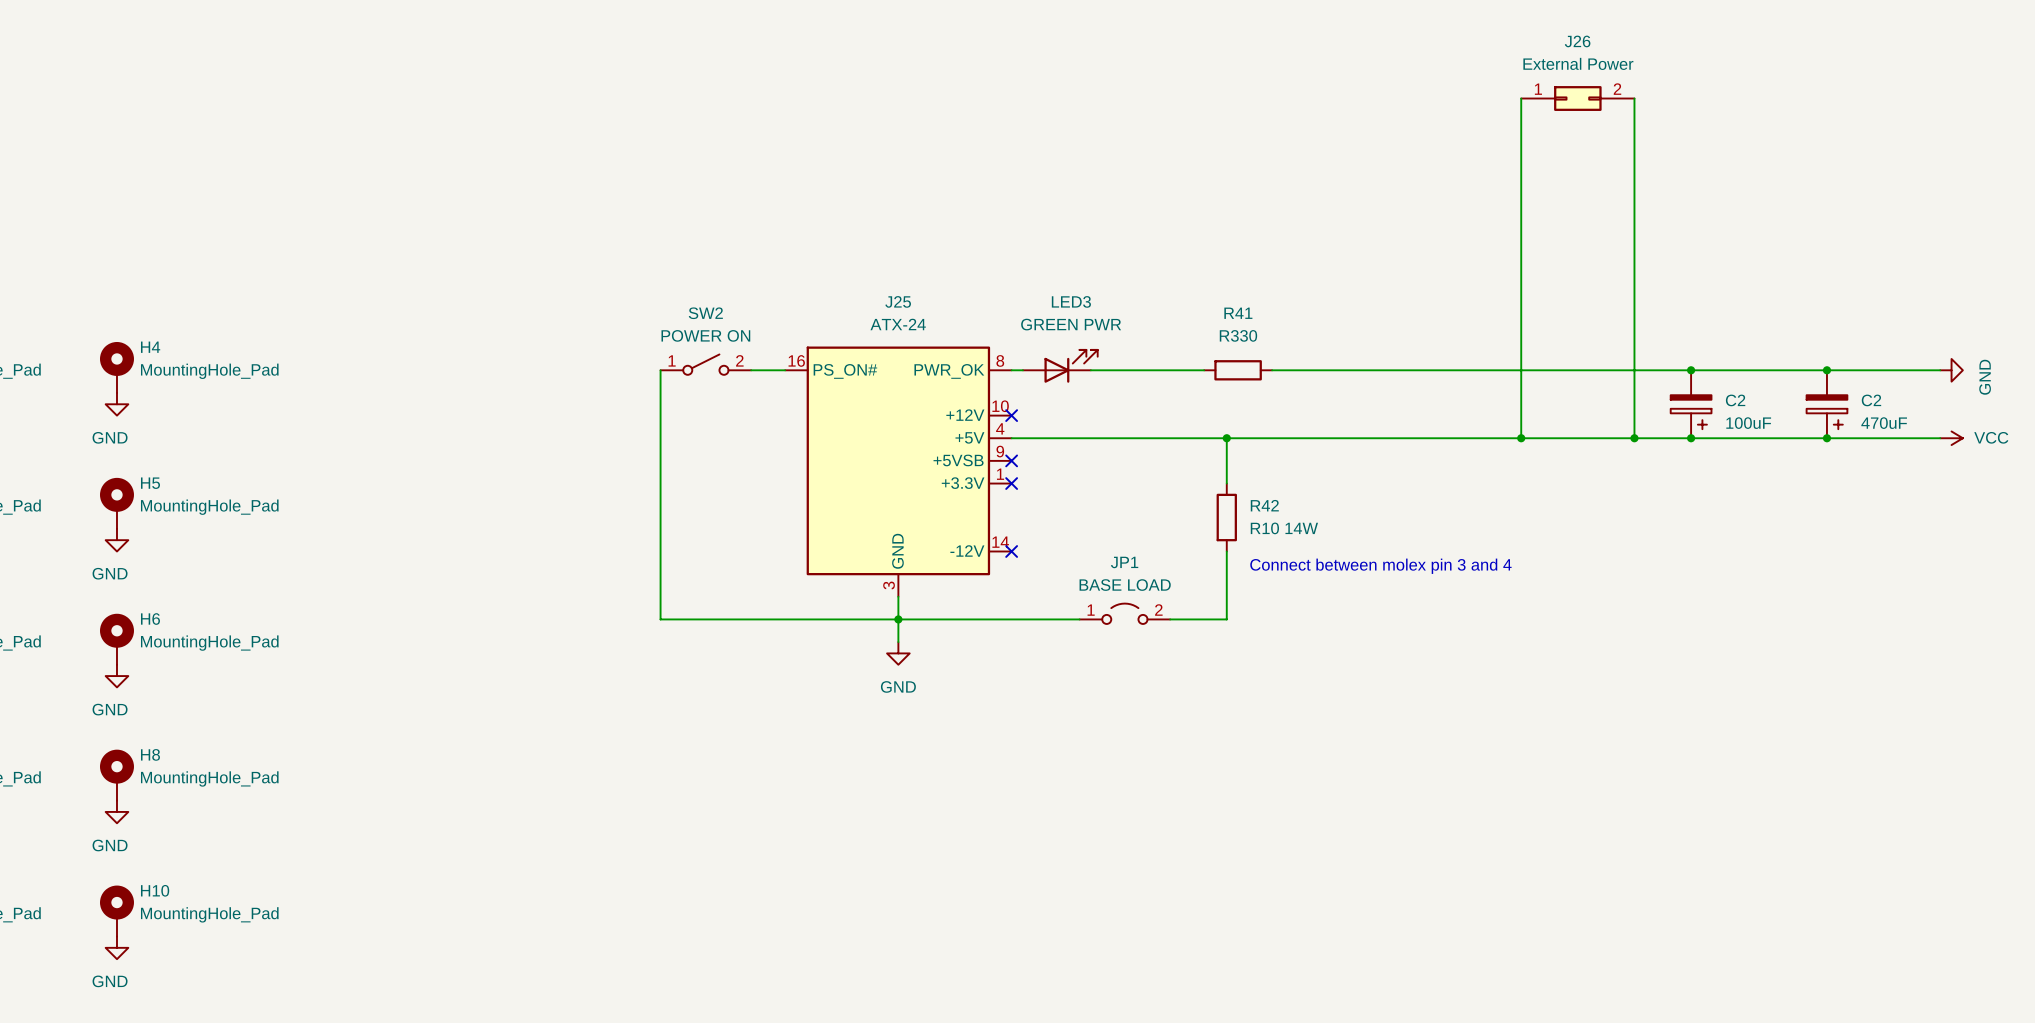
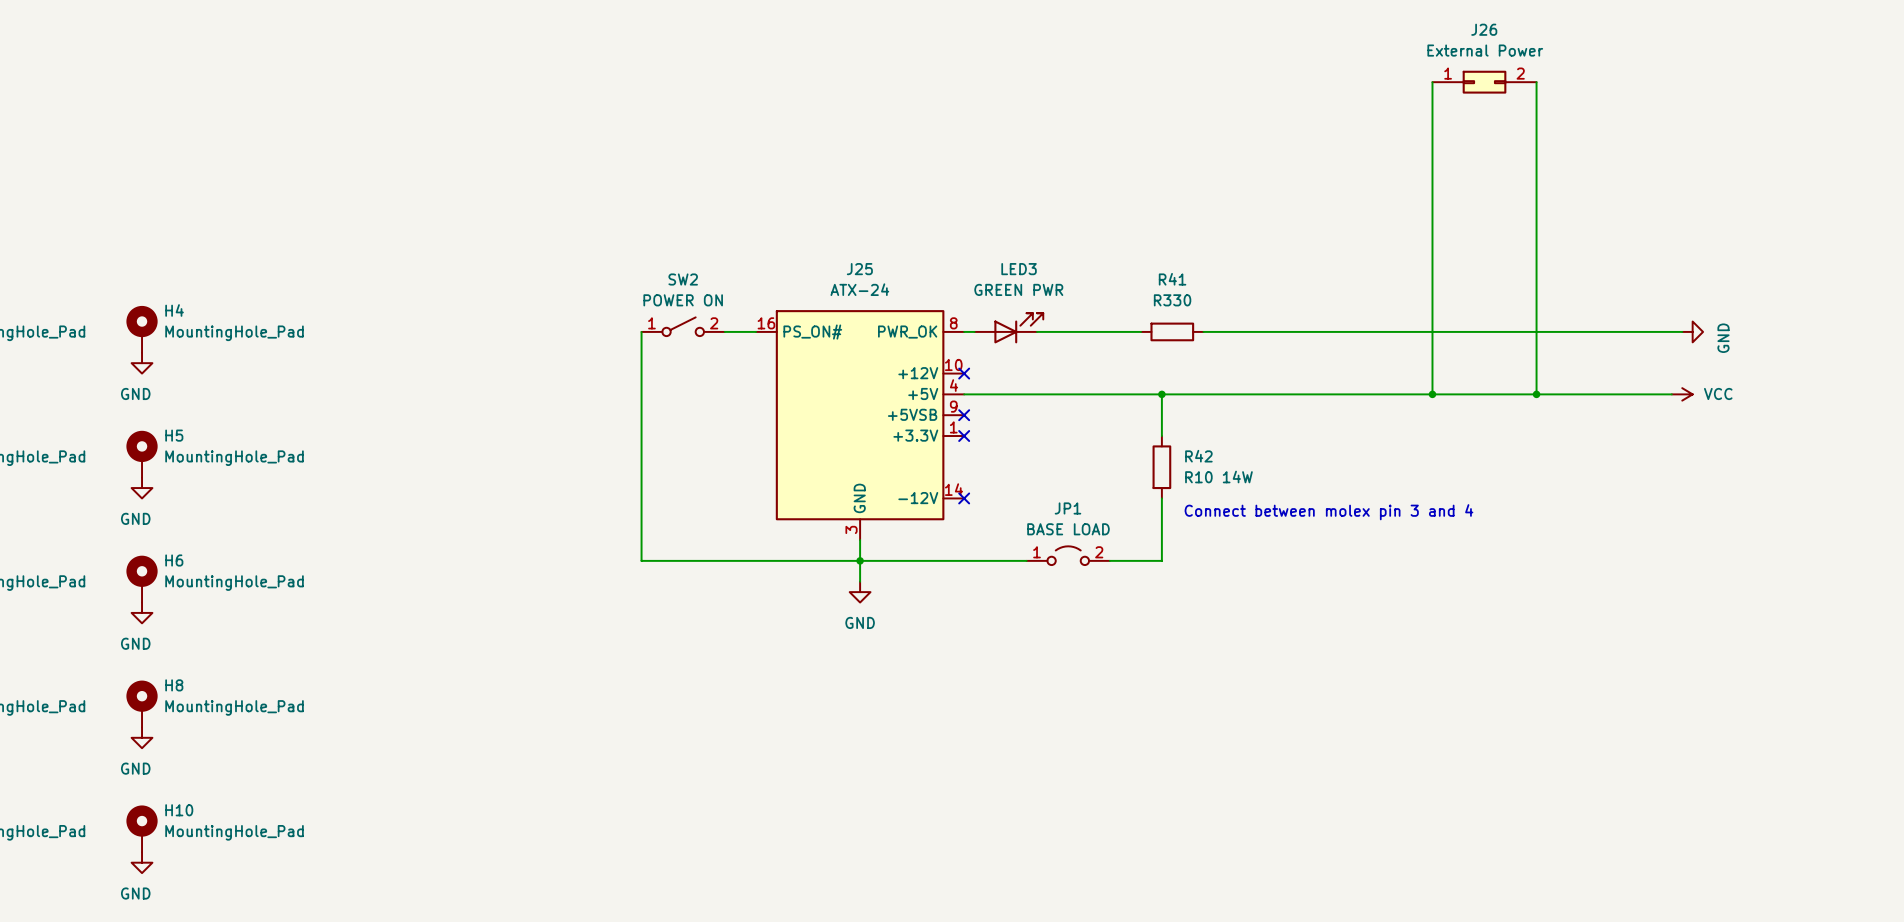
junction: (1691, 370) -> none
wire: (1793, 370) (1940, 370) -> none
junction: (1826, 370) -> none
power symbol position: GND (1951, 370) -> GND (1692, 331)
C2: 100uF (1691, 404) -> none
C2: 470uF (1826, 404) -> none
junction: (1691, 438) -> none
wire: (1781, 438) (1940, 438) -> none
junction: (1826, 438) -> none
power symbol position: VCC (1951, 438) -> VCC (1682, 394)

